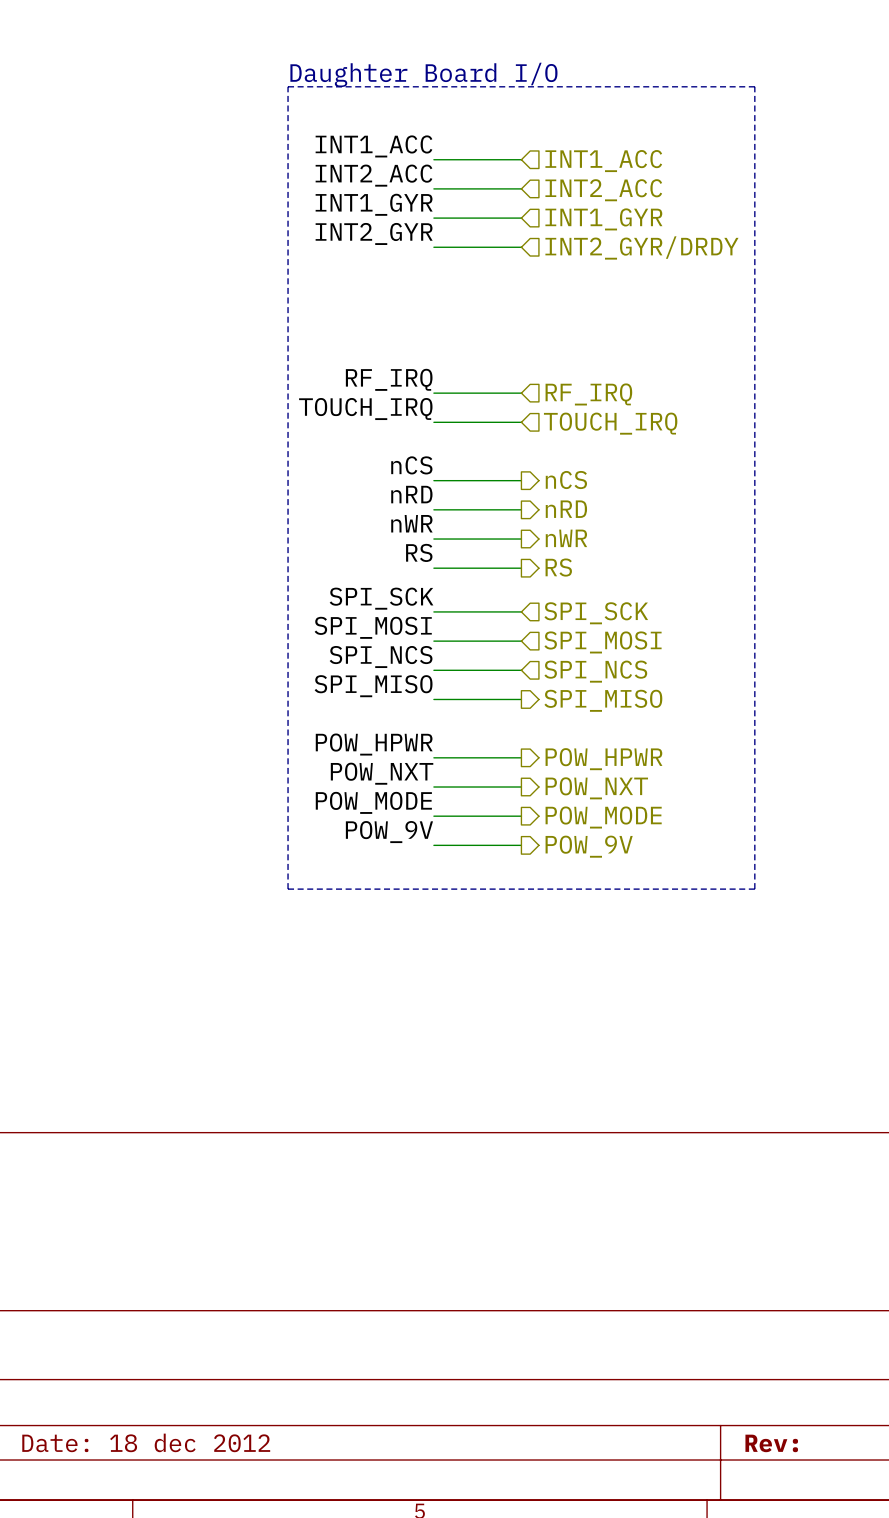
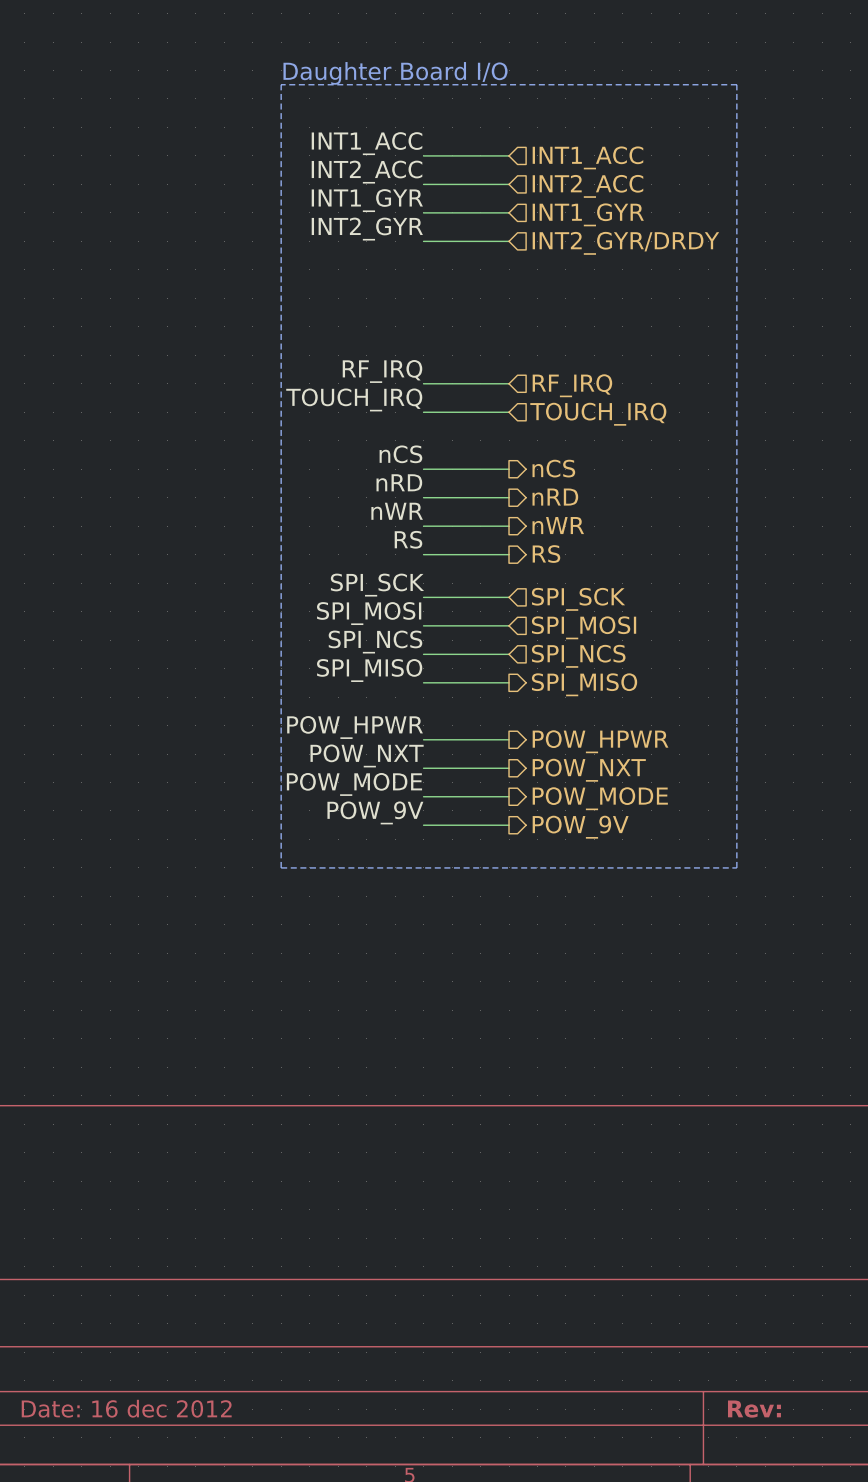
title block: Date: 18 dec 2012 (146, 1442) -> Date: 16 dec 2012 (126, 1408)

